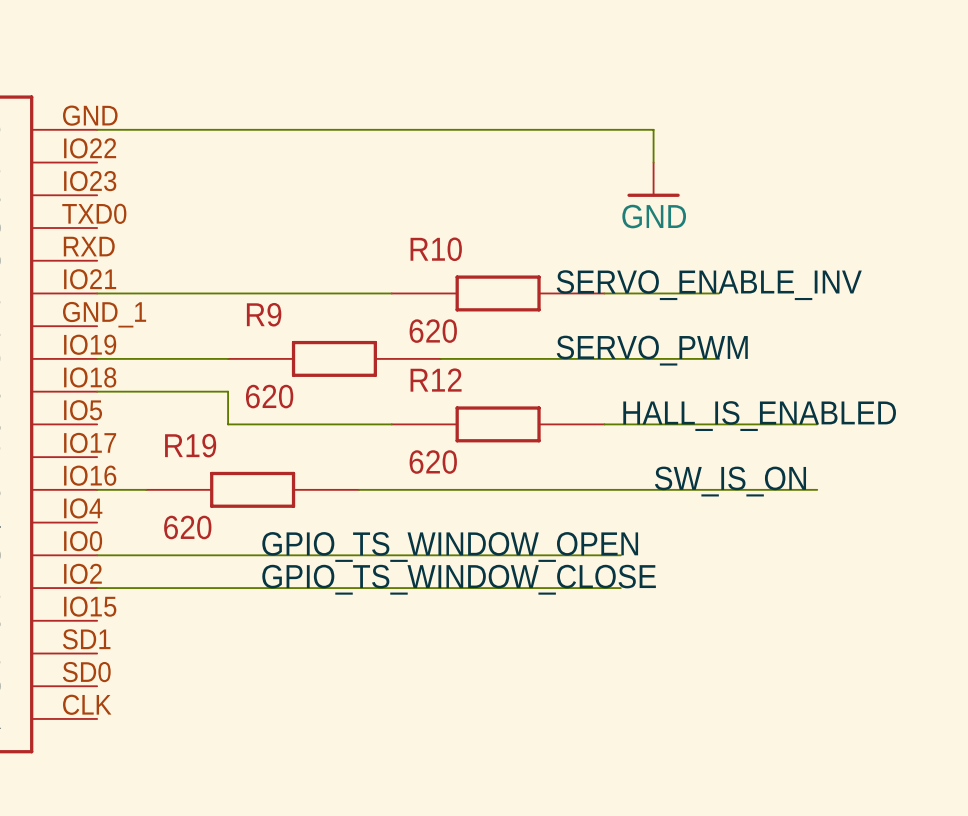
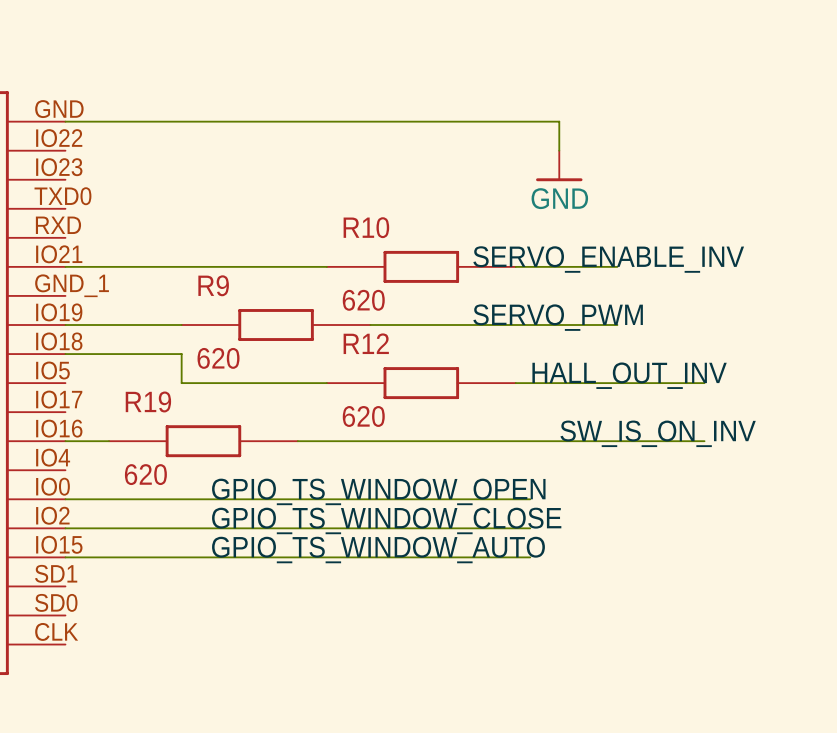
label: HALL_IS_ENABLED (759, 416) -> HALL_OUT_INV (629, 375)
label: SW_IS_ON (730, 481) -> SW_IS_ON_INV (658, 433)
label: none -> GPIO_TS_WINDOW_AUTO (378, 550)
wire: none -> (65, 557) (530, 557)

